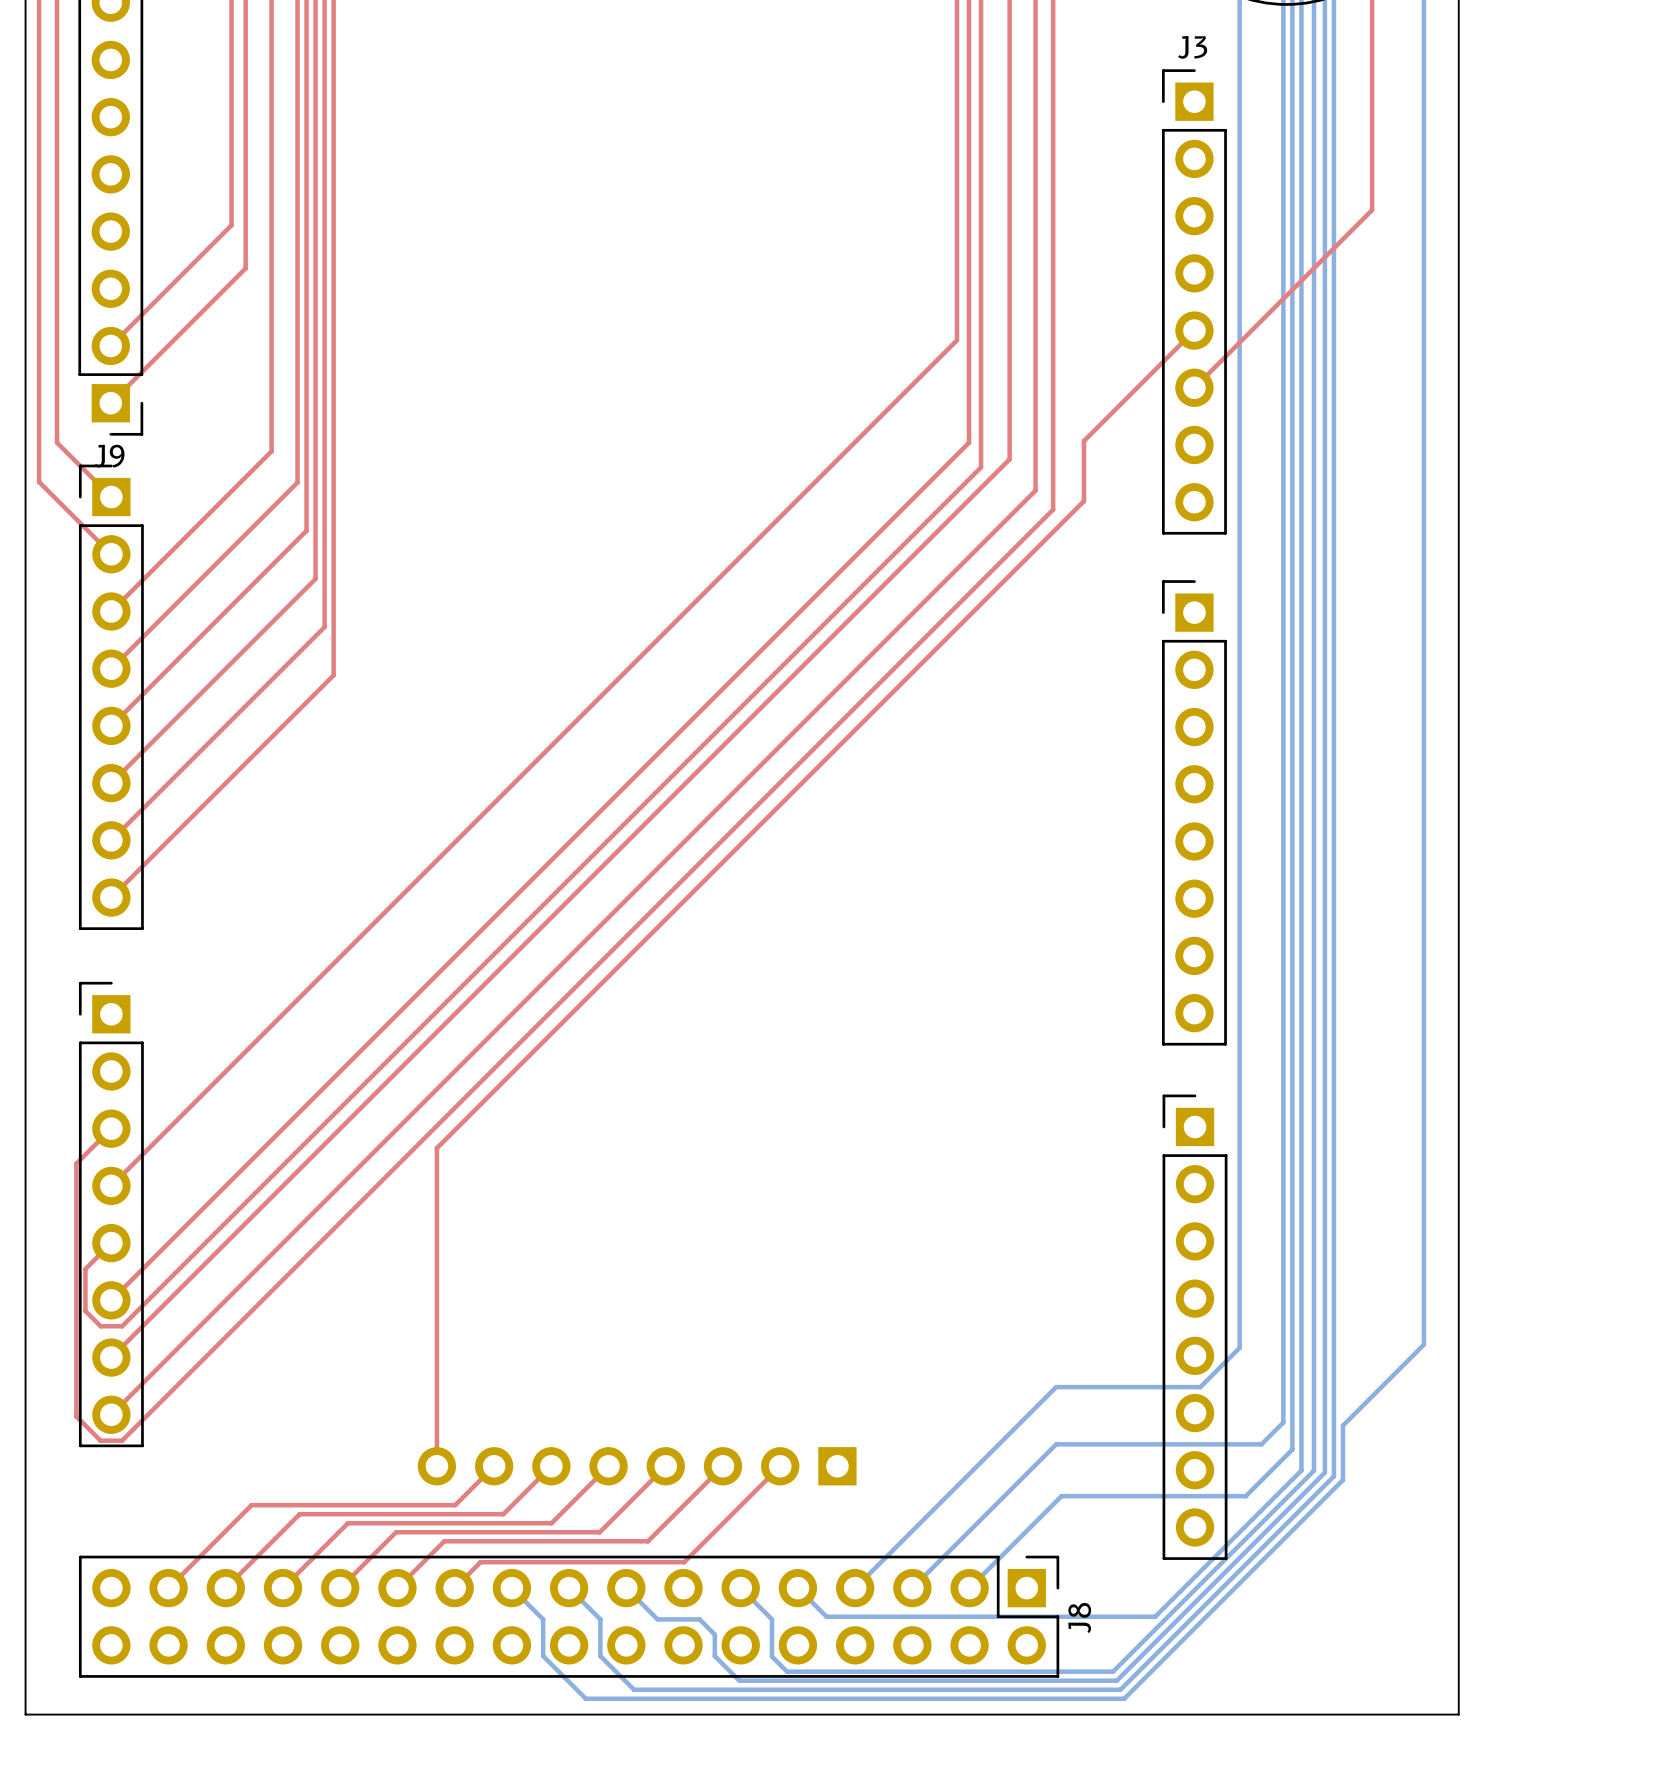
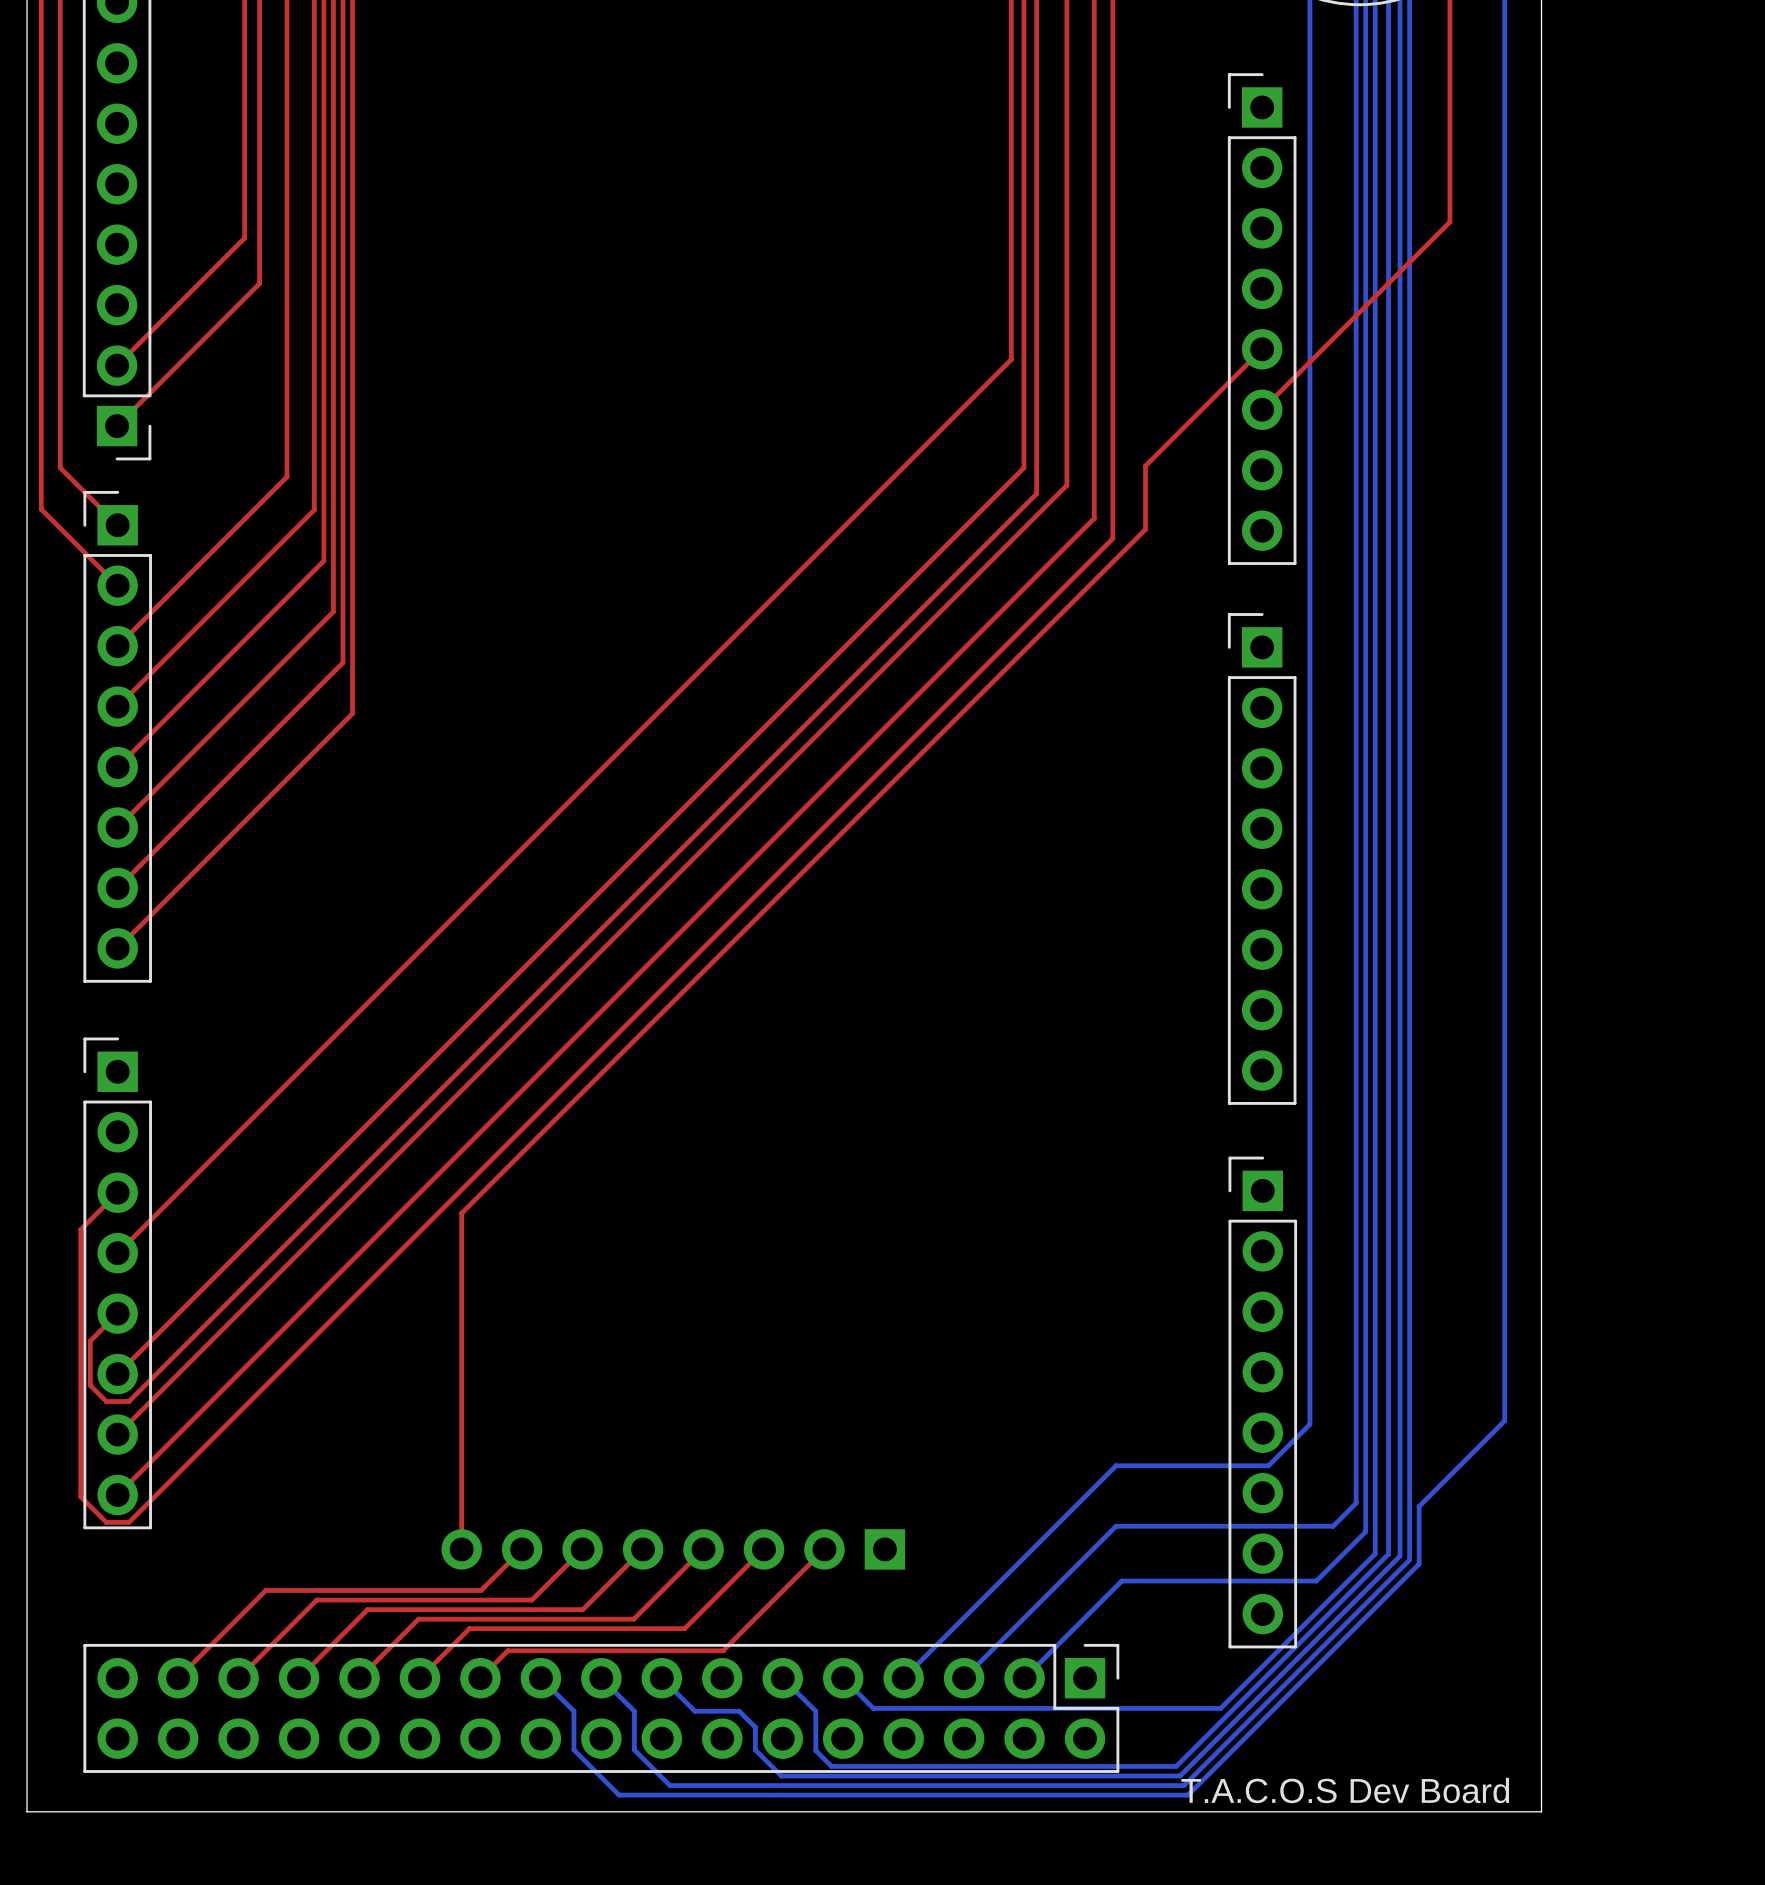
J3 name: J3 (1192, 47) -> none
J9 name: J9 (109, 456) -> none
J8 name: J8 (1079, 1617) -> none
text: none -> T.A.C.O.S Dev Board (1345, 1790)

